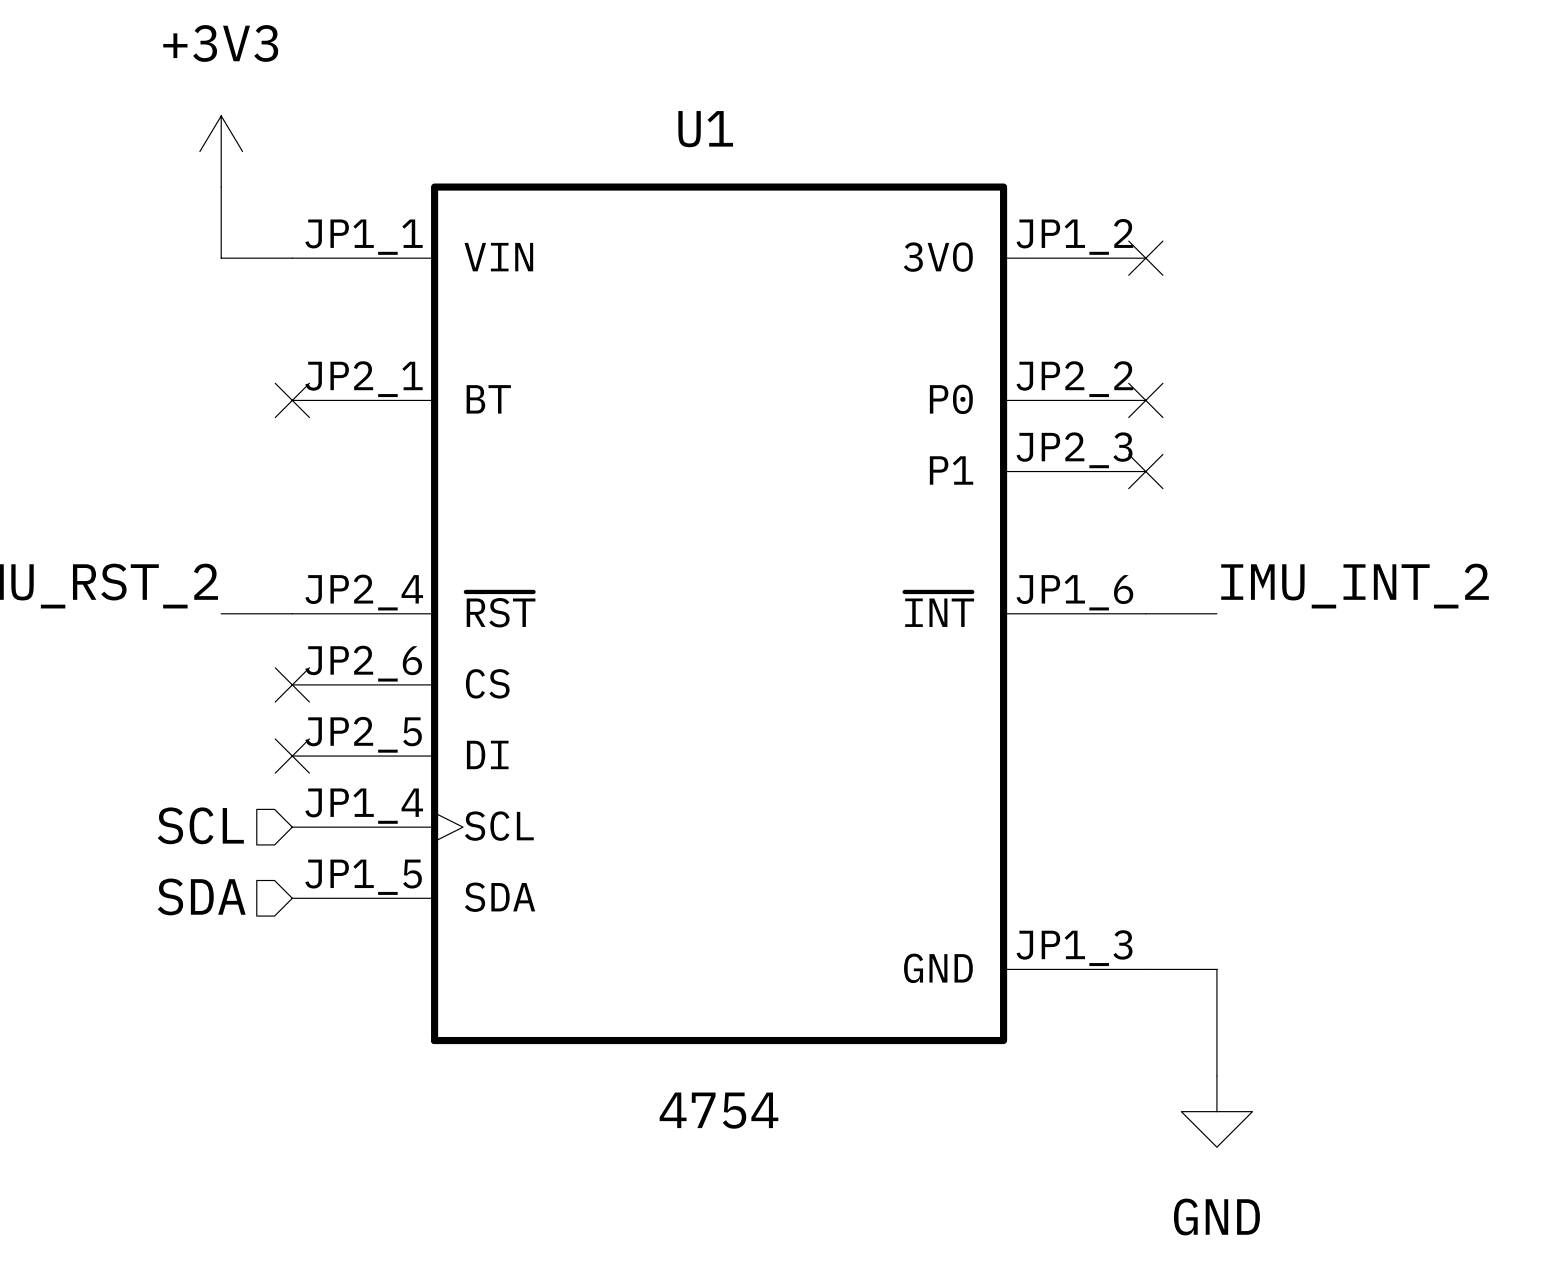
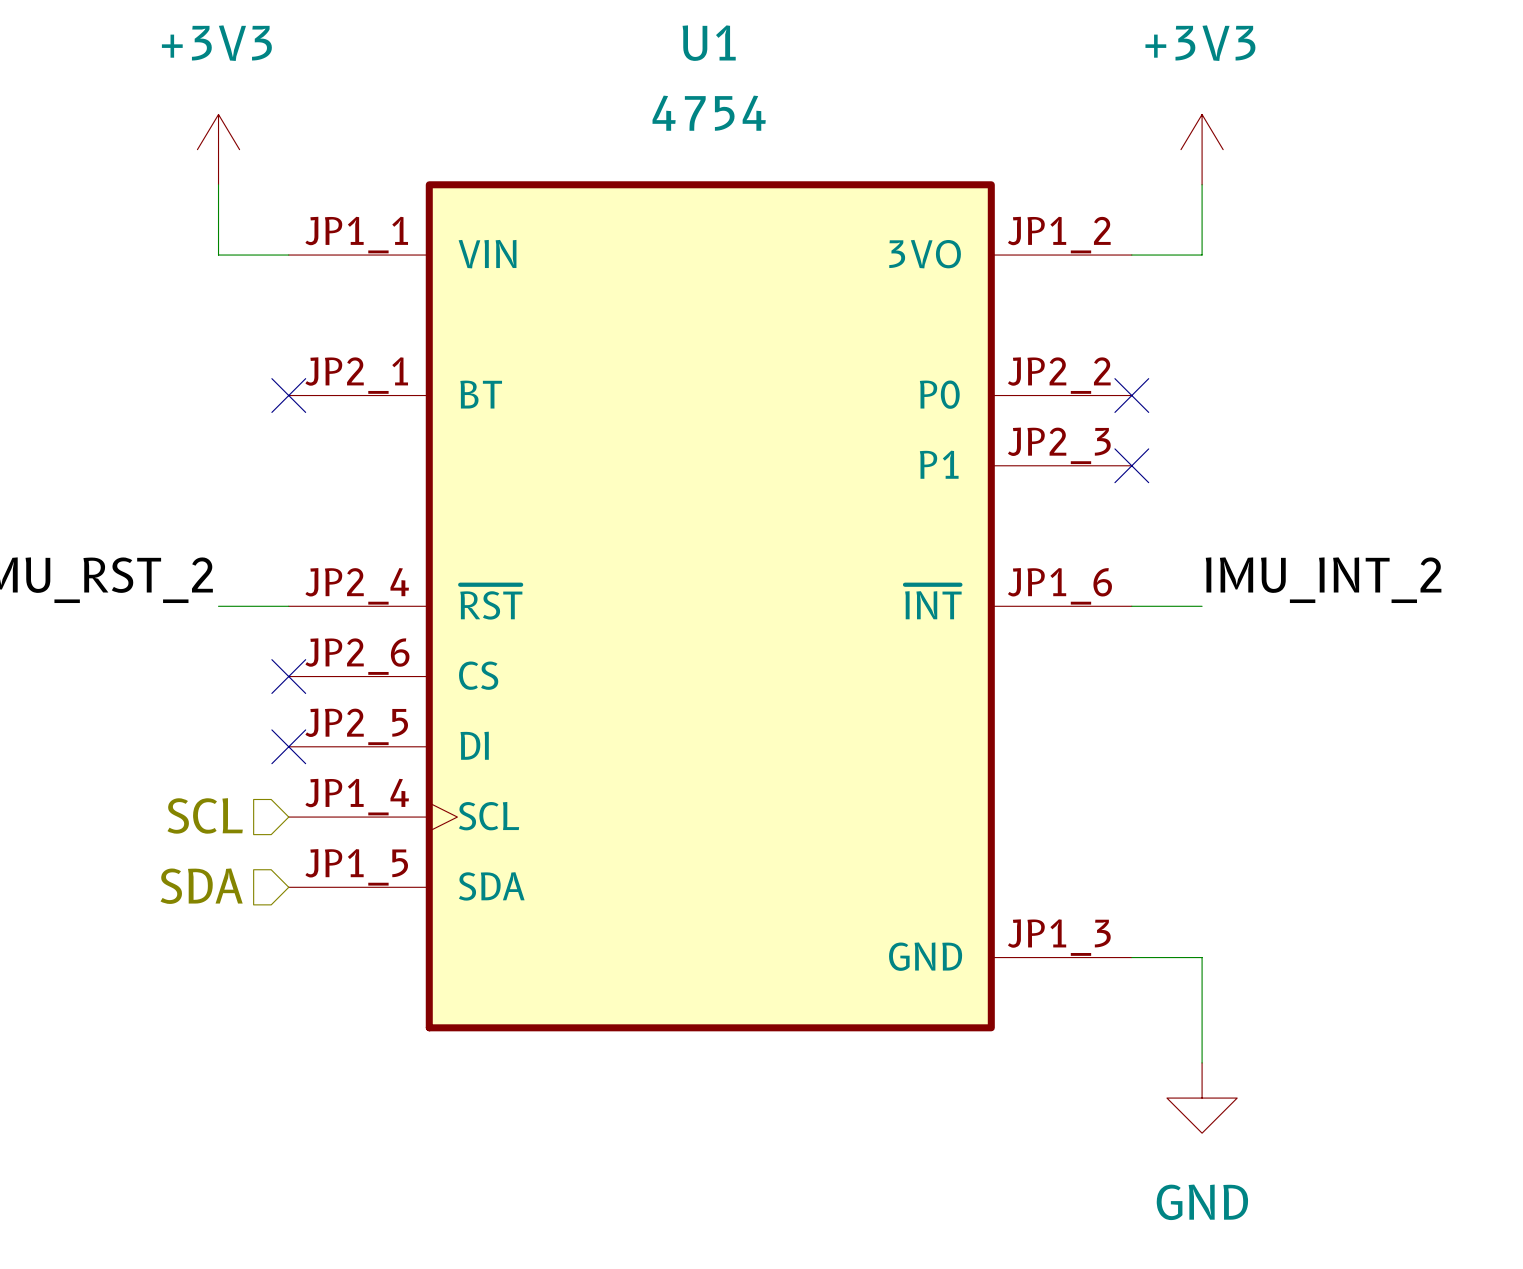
U1 name position: U1 (705, 129) -> U1 (709, 43)
power symbol: none -> +3V3 (1202, 149)
wire: none -> (1202, 184) (1202, 255) (1131, 255)
no-connect mark: (1145, 258) -> none
U1 value position: 4754 (718, 1110) -> 4754 (709, 113)

